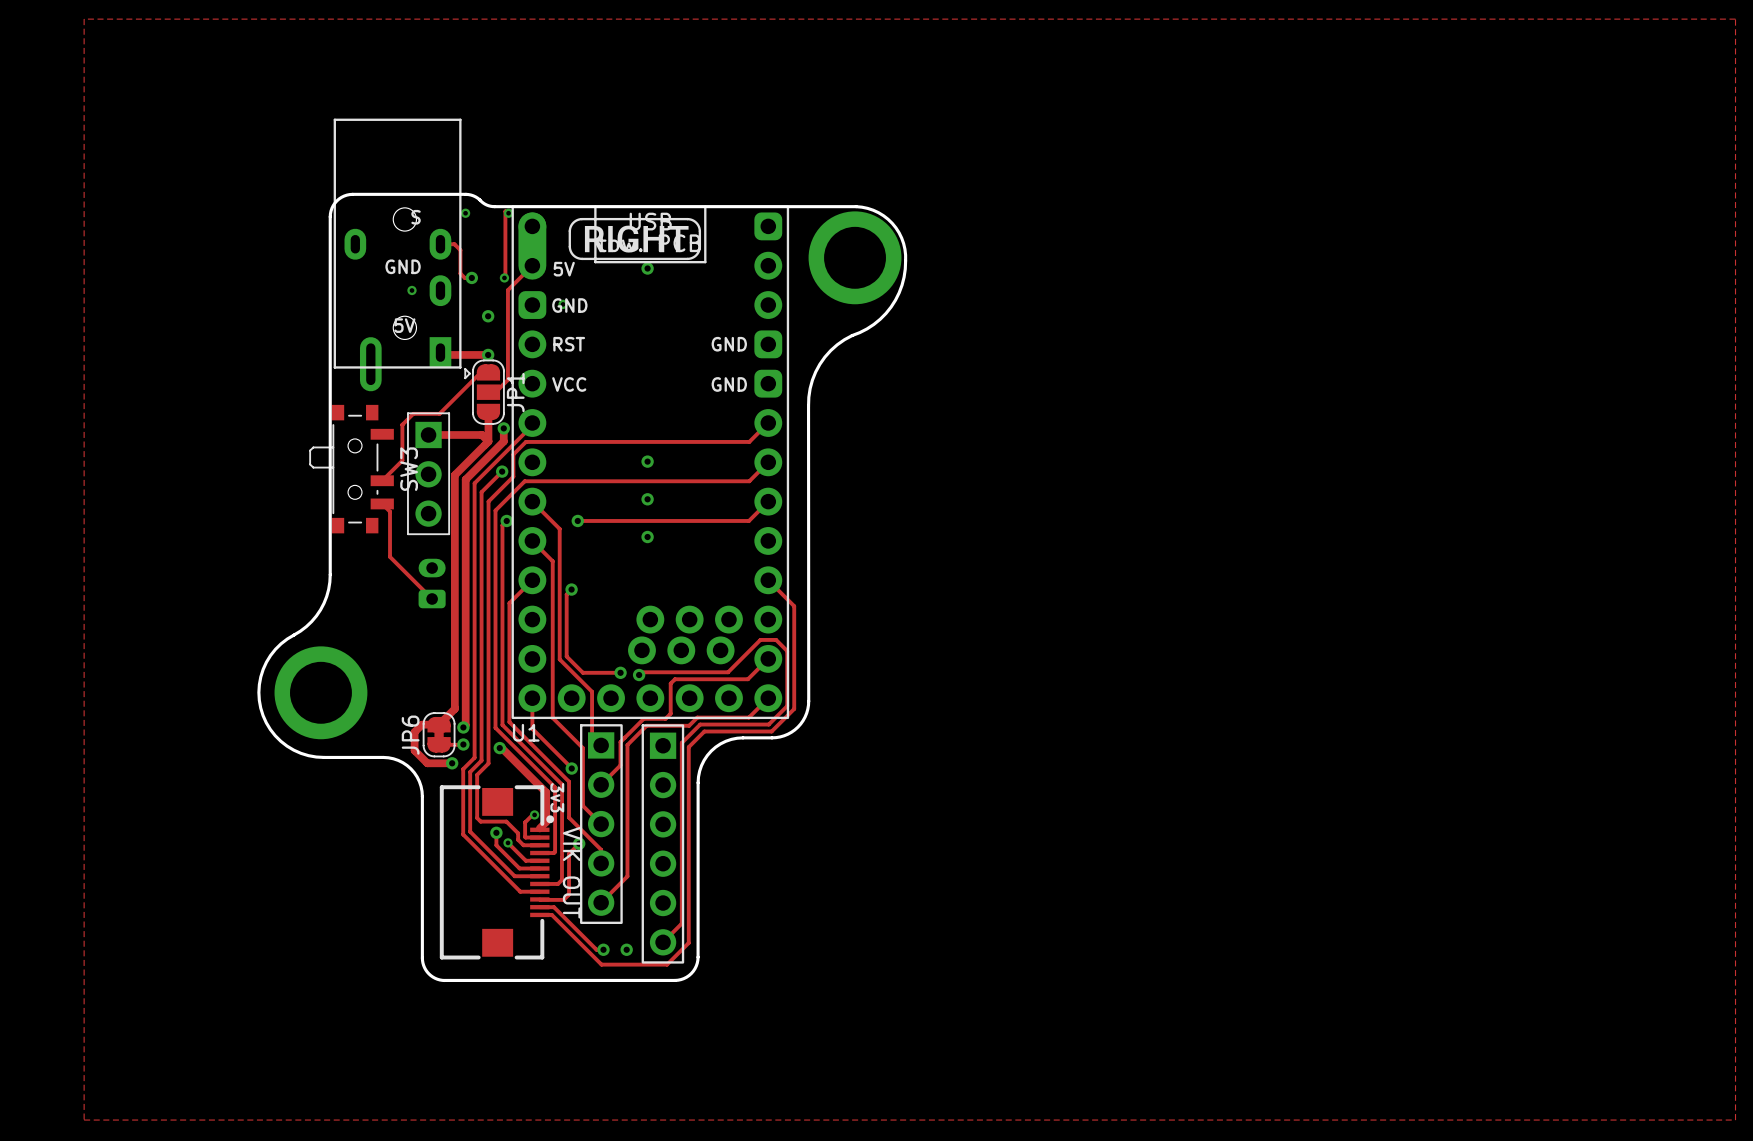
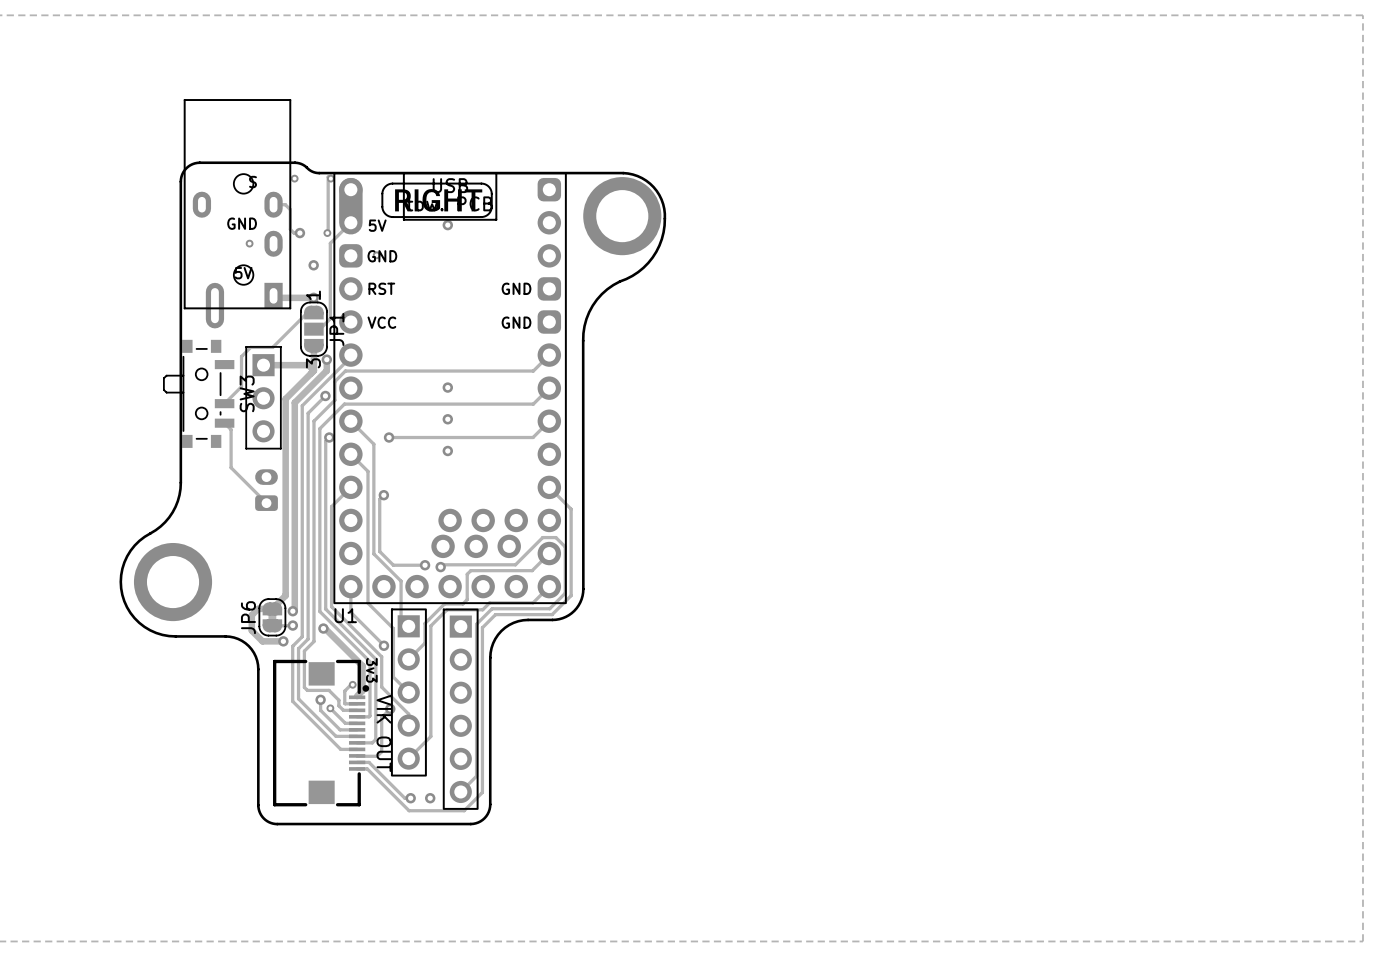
JP1 footprint: [464, 359, 505, 425] -> [300, 301, 328, 357]

